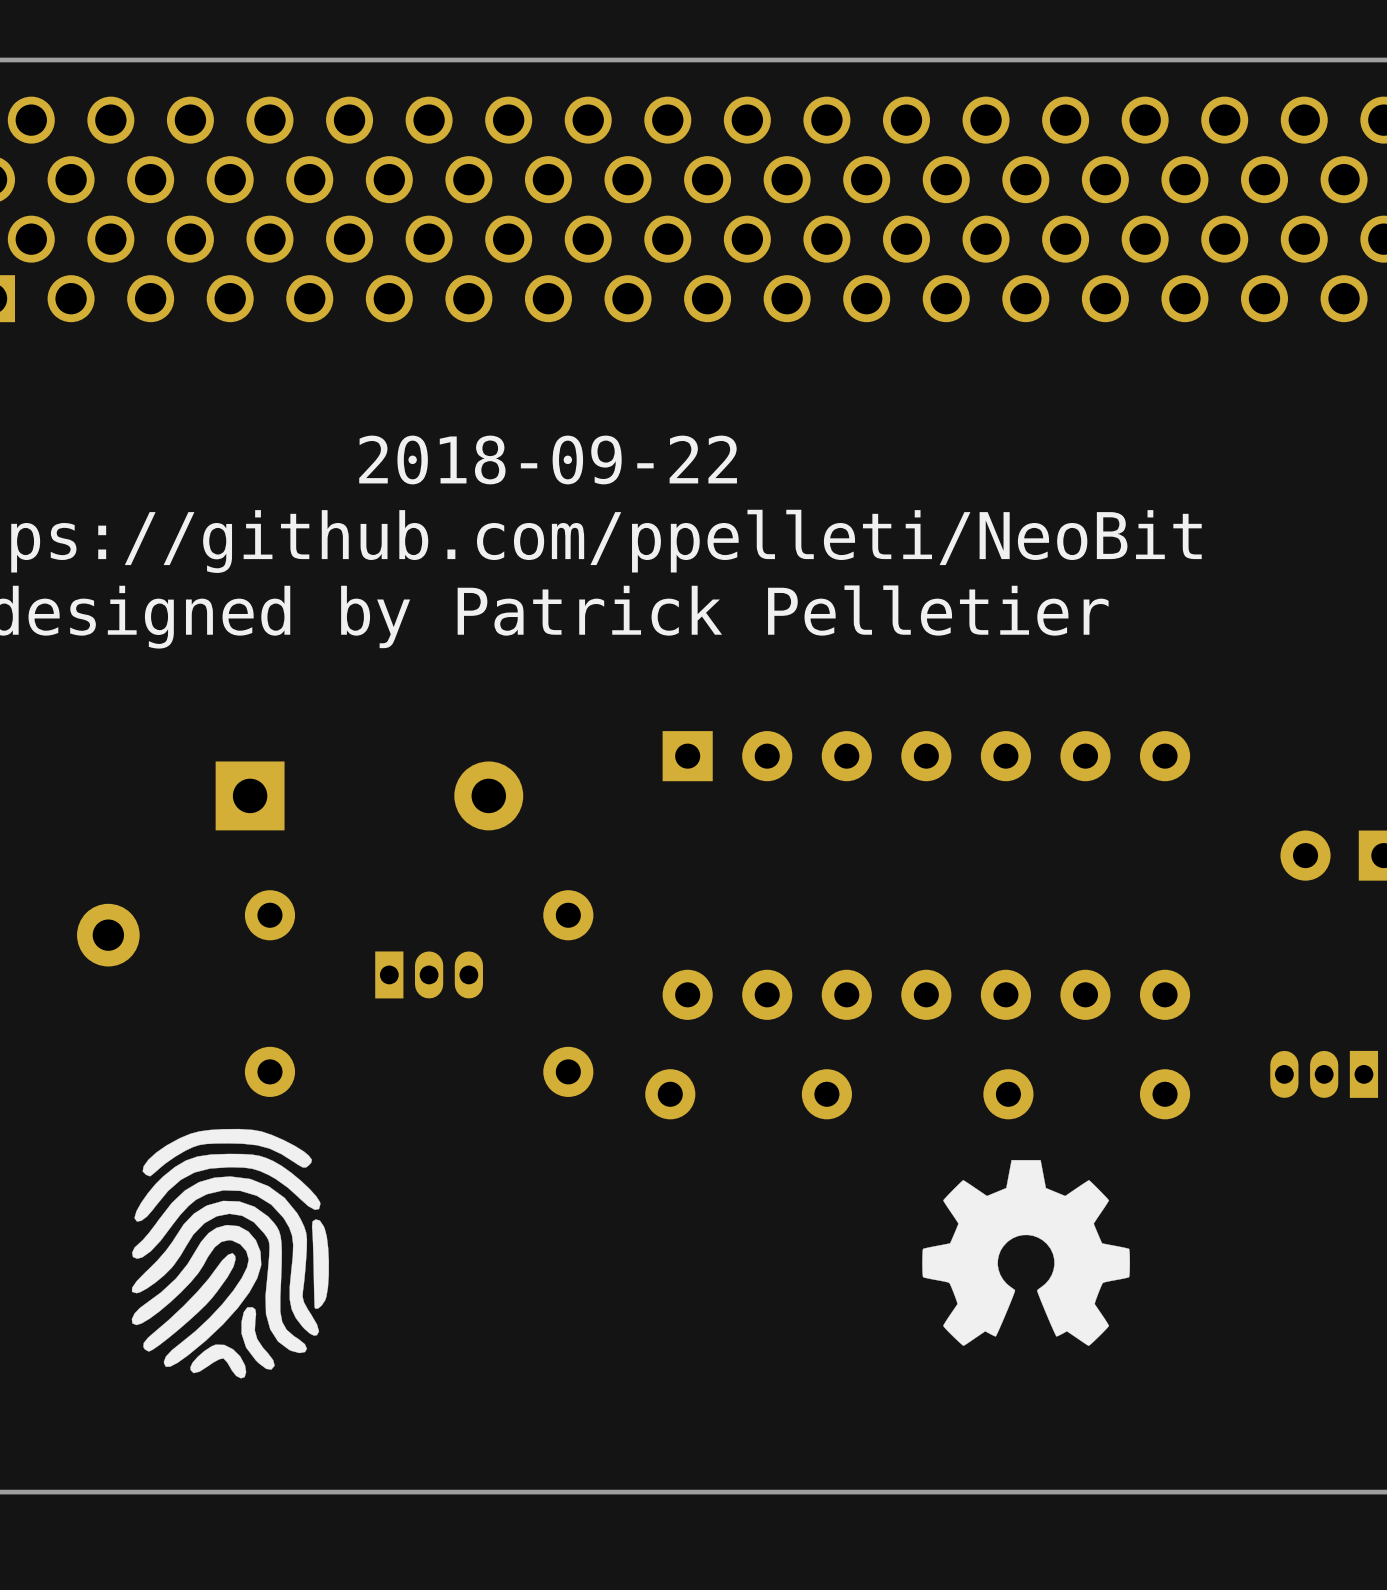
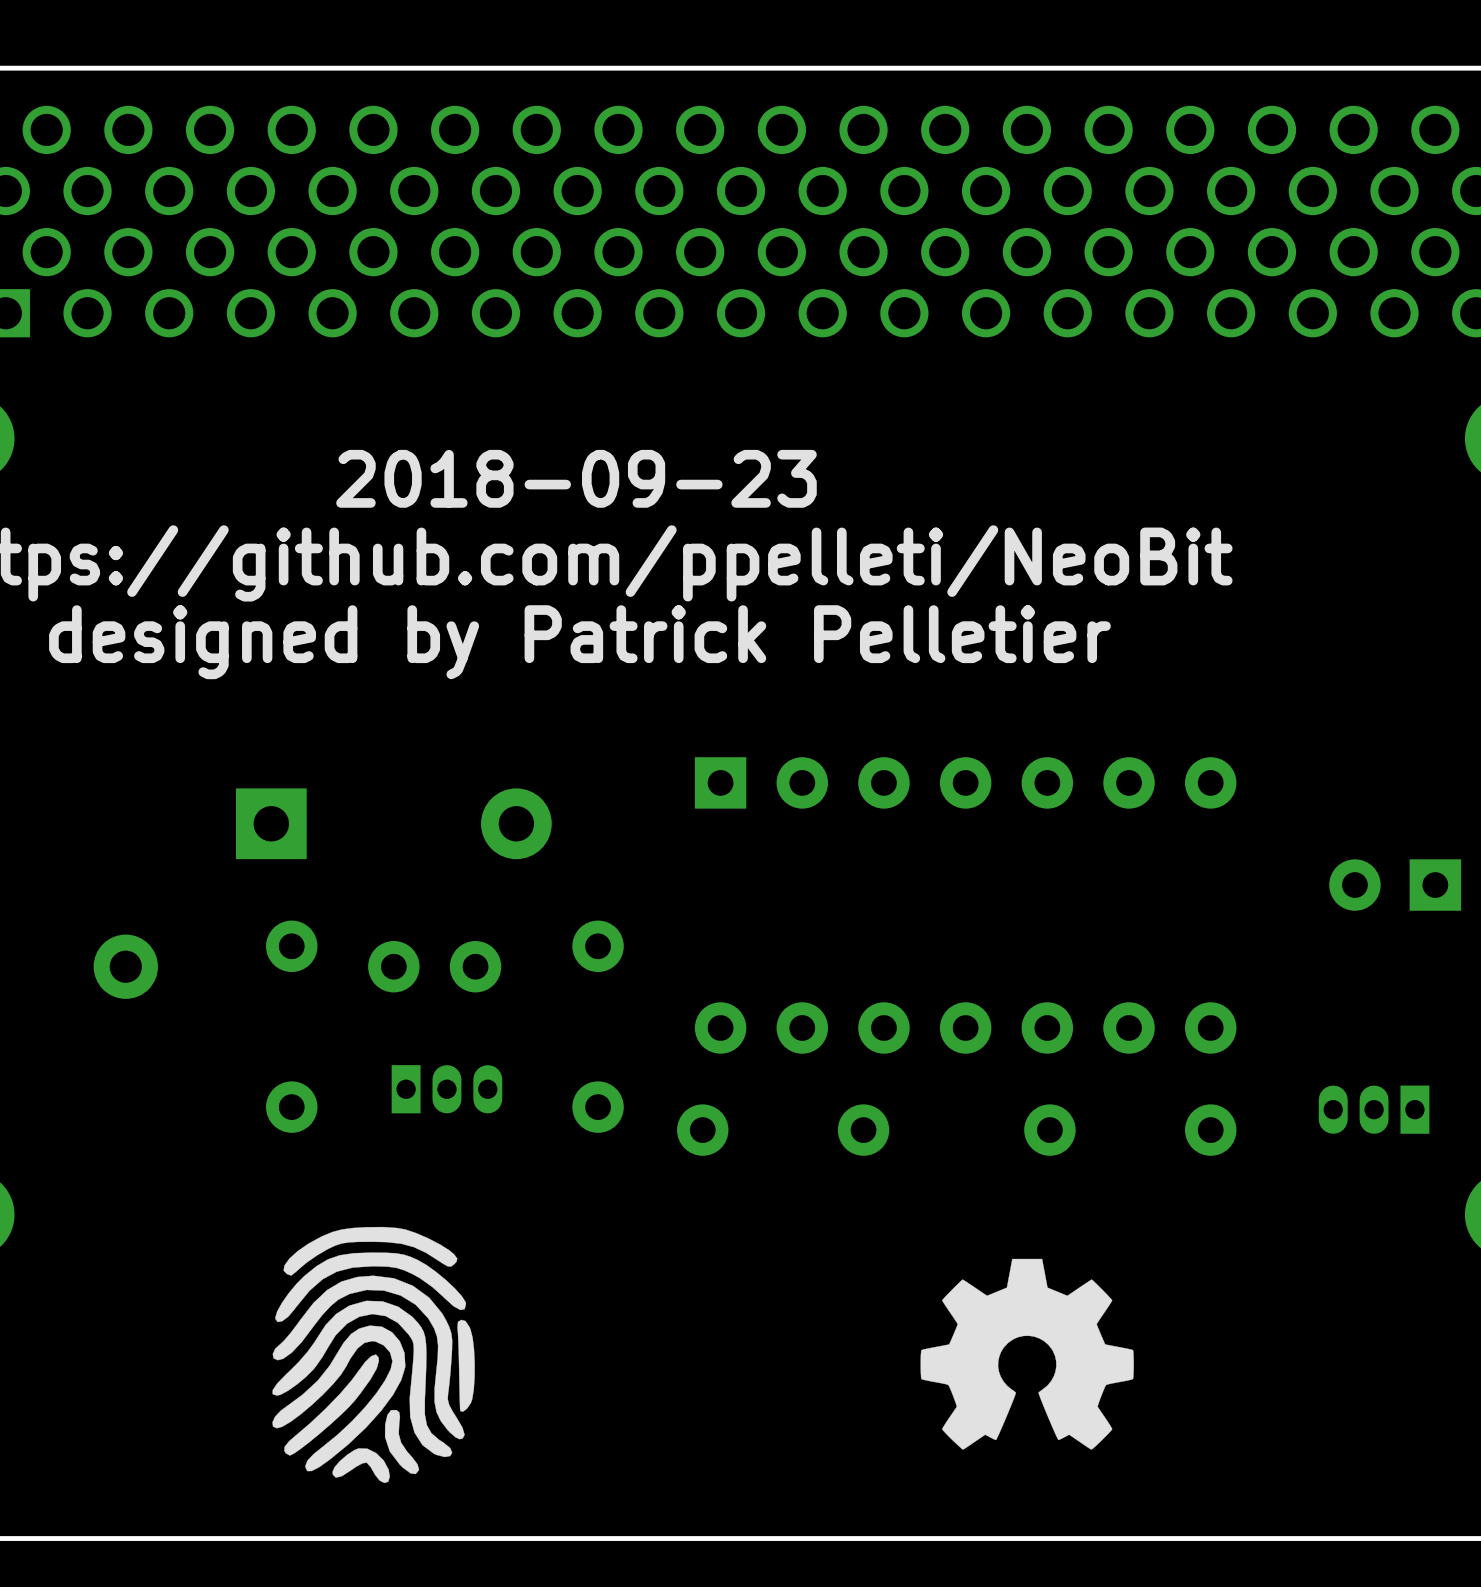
text: 2018-09-22 (548, 459) -> 2018-09-23 (576, 478)
part: none -> (434, 966)
part position: (429, 974) -> (446, 1089)
drawing position: (1026, 1252) -> (1027, 1354)
drawing position: (230, 1253) -> (373, 1355)

